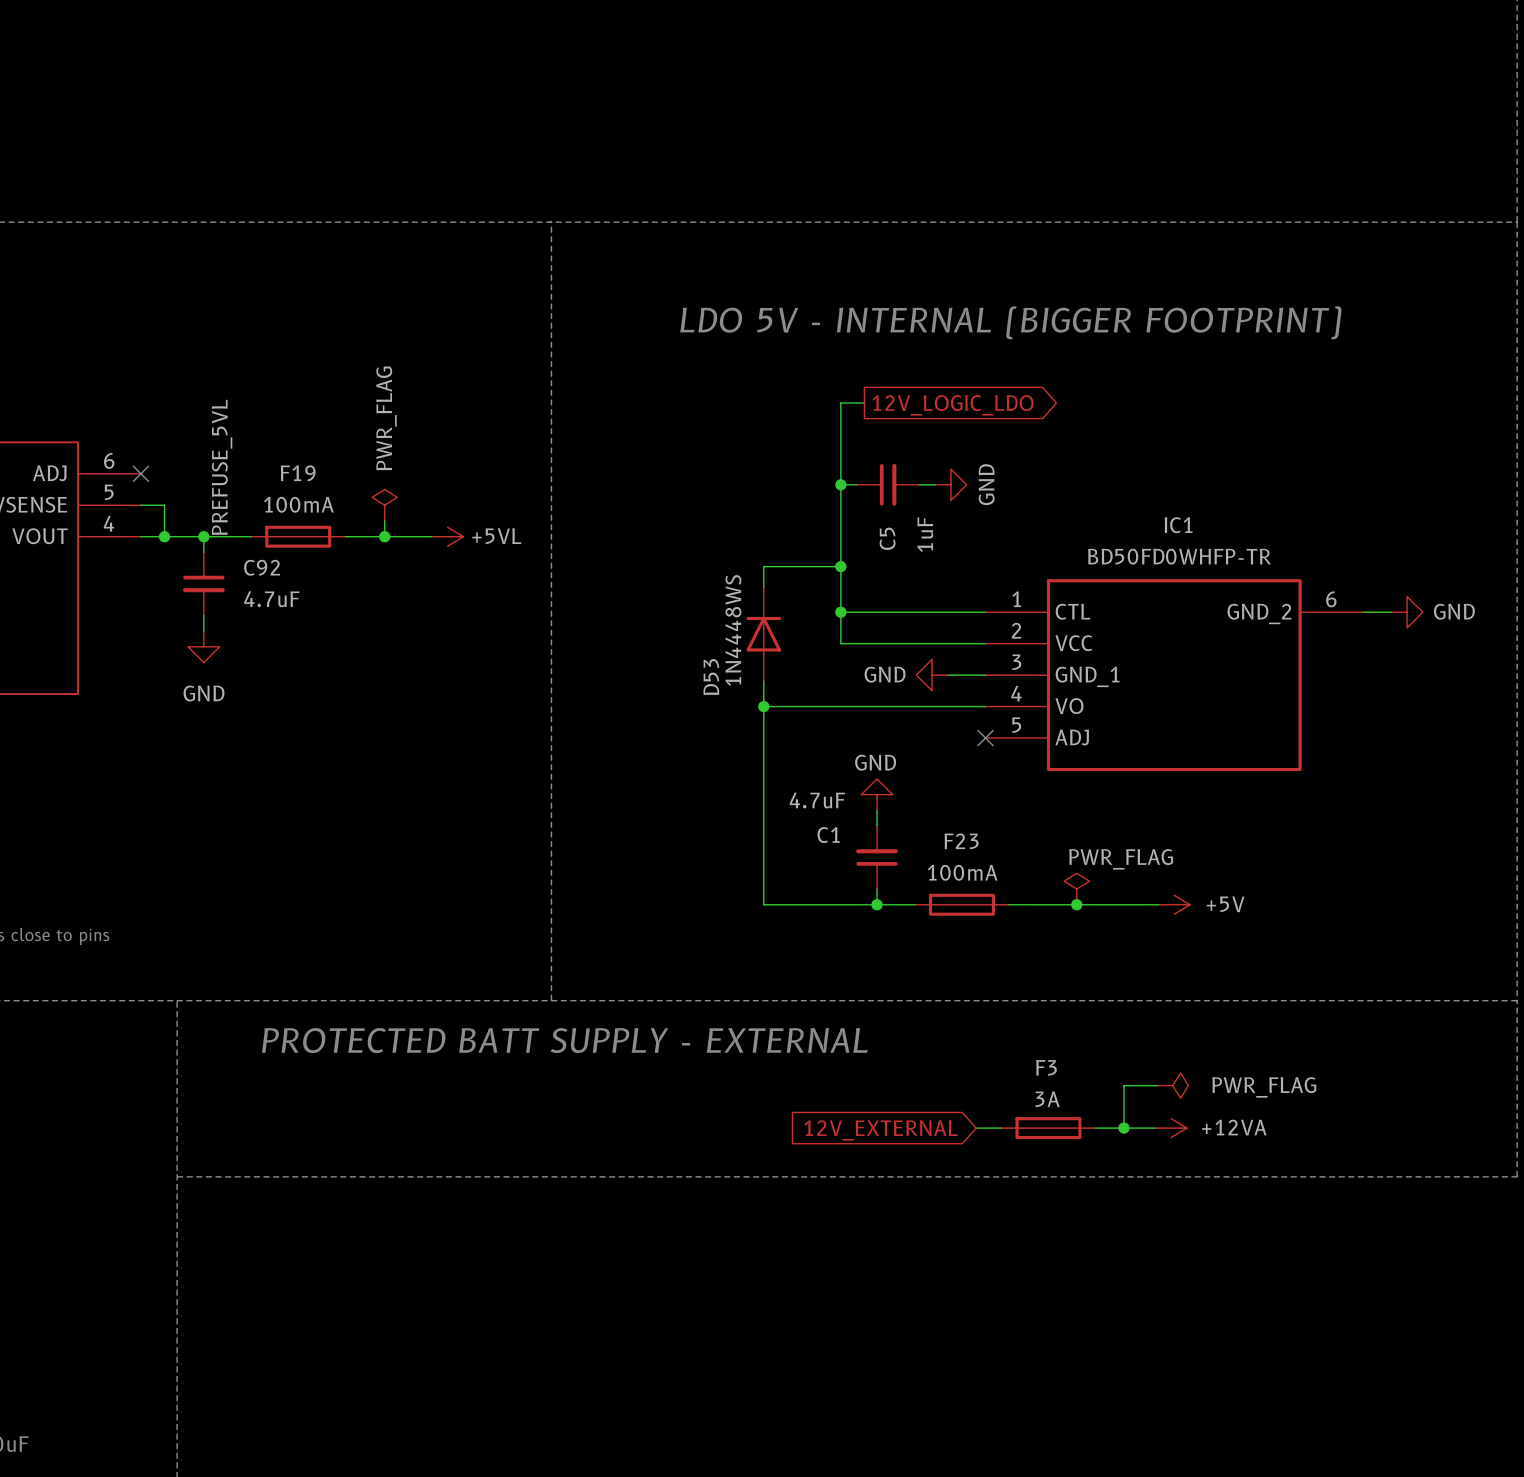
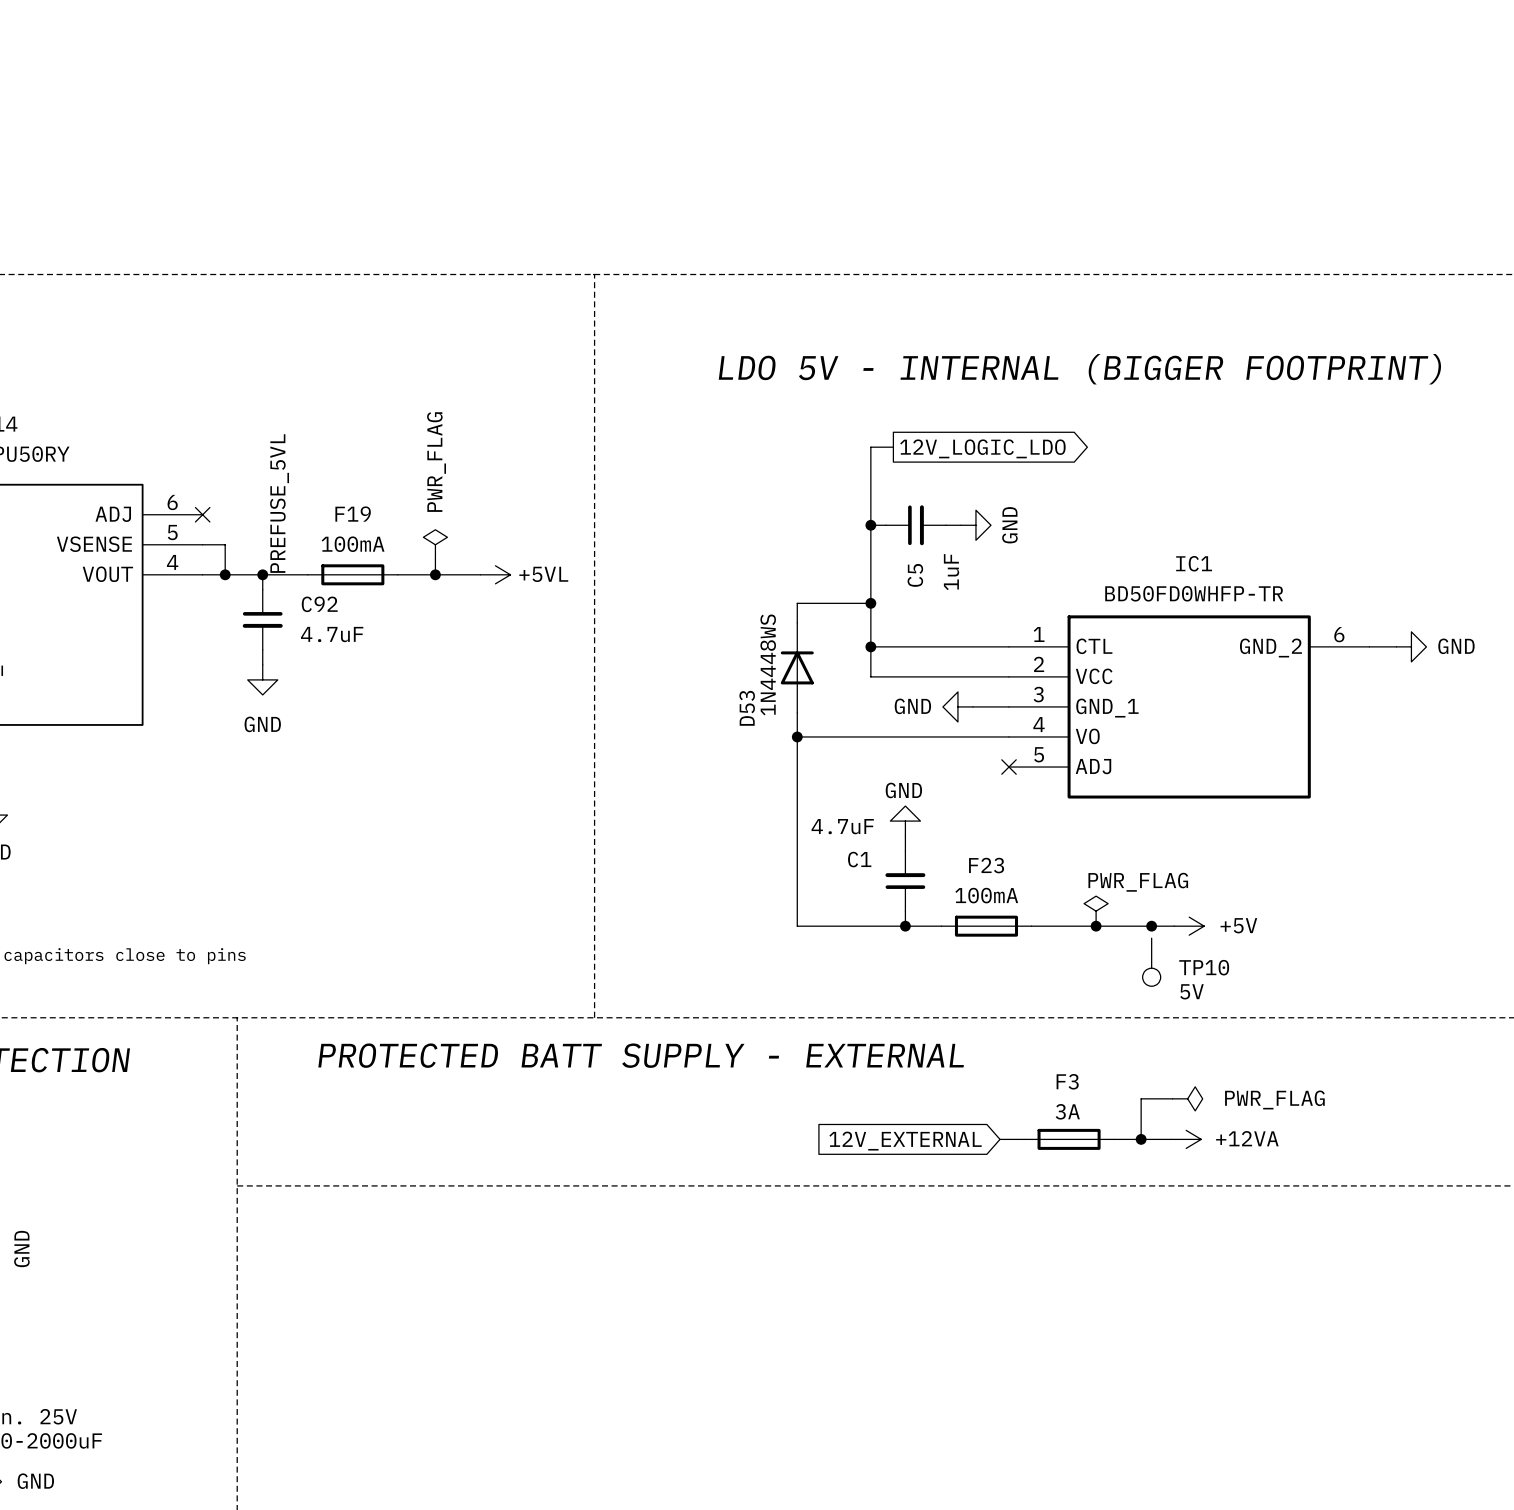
junction: none -> (1151, 926)
TP10: none -> 5V (1151, 962)

